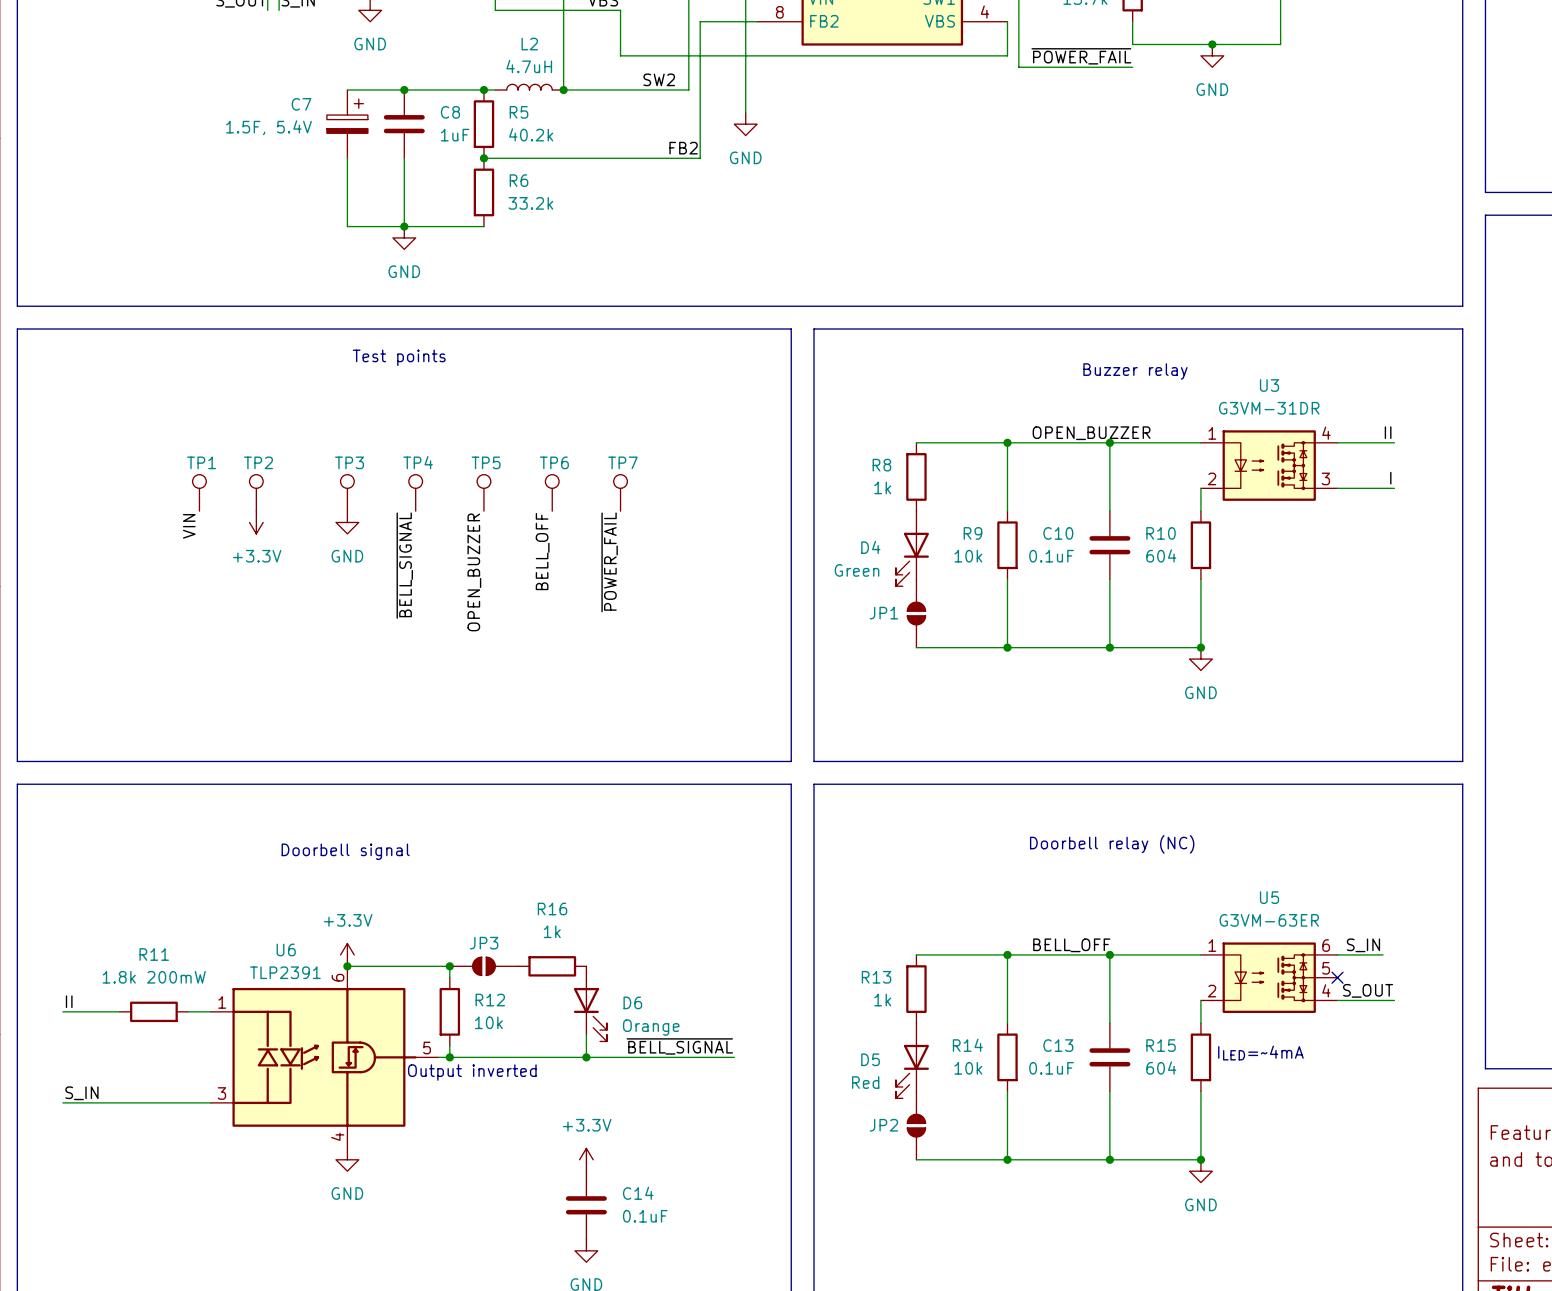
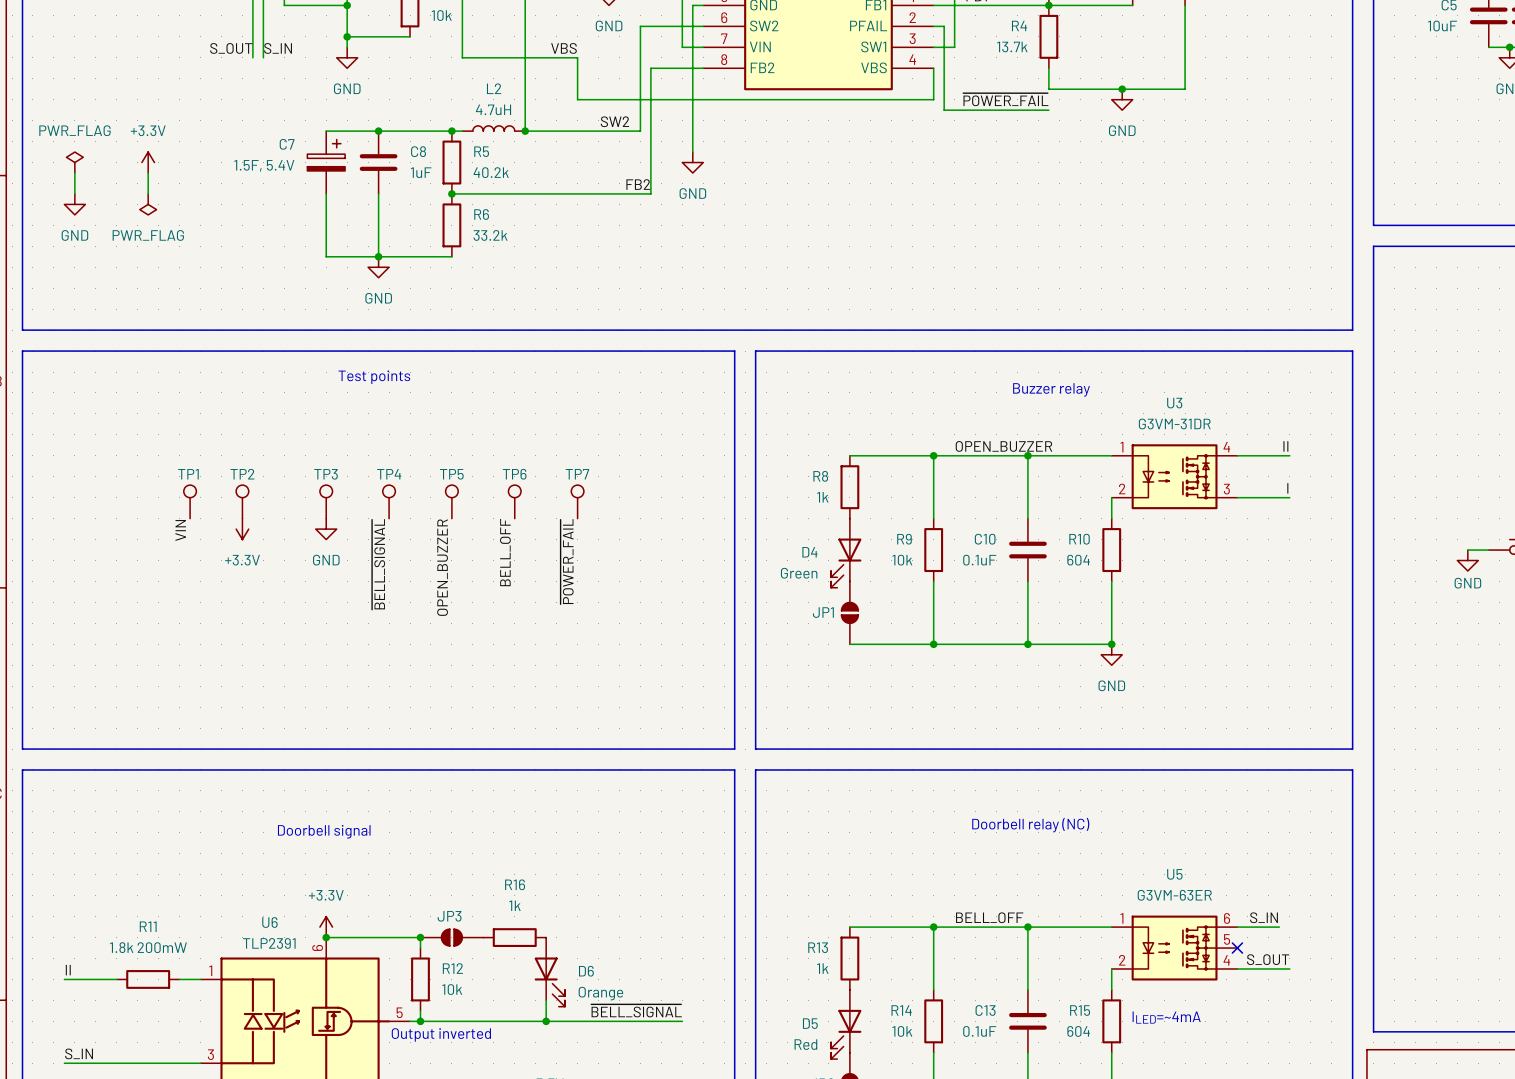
power symbol: none -> PWR_FLAG (74, 162)
power symbol: none -> +3.3V (148, 162)
wire: none -> (74, 173) (74, 193)
wire: none -> (148, 173) (148, 193)
power symbol: none -> GND (74, 204)
power symbol: none -> PWR_FLAG (148, 204)

